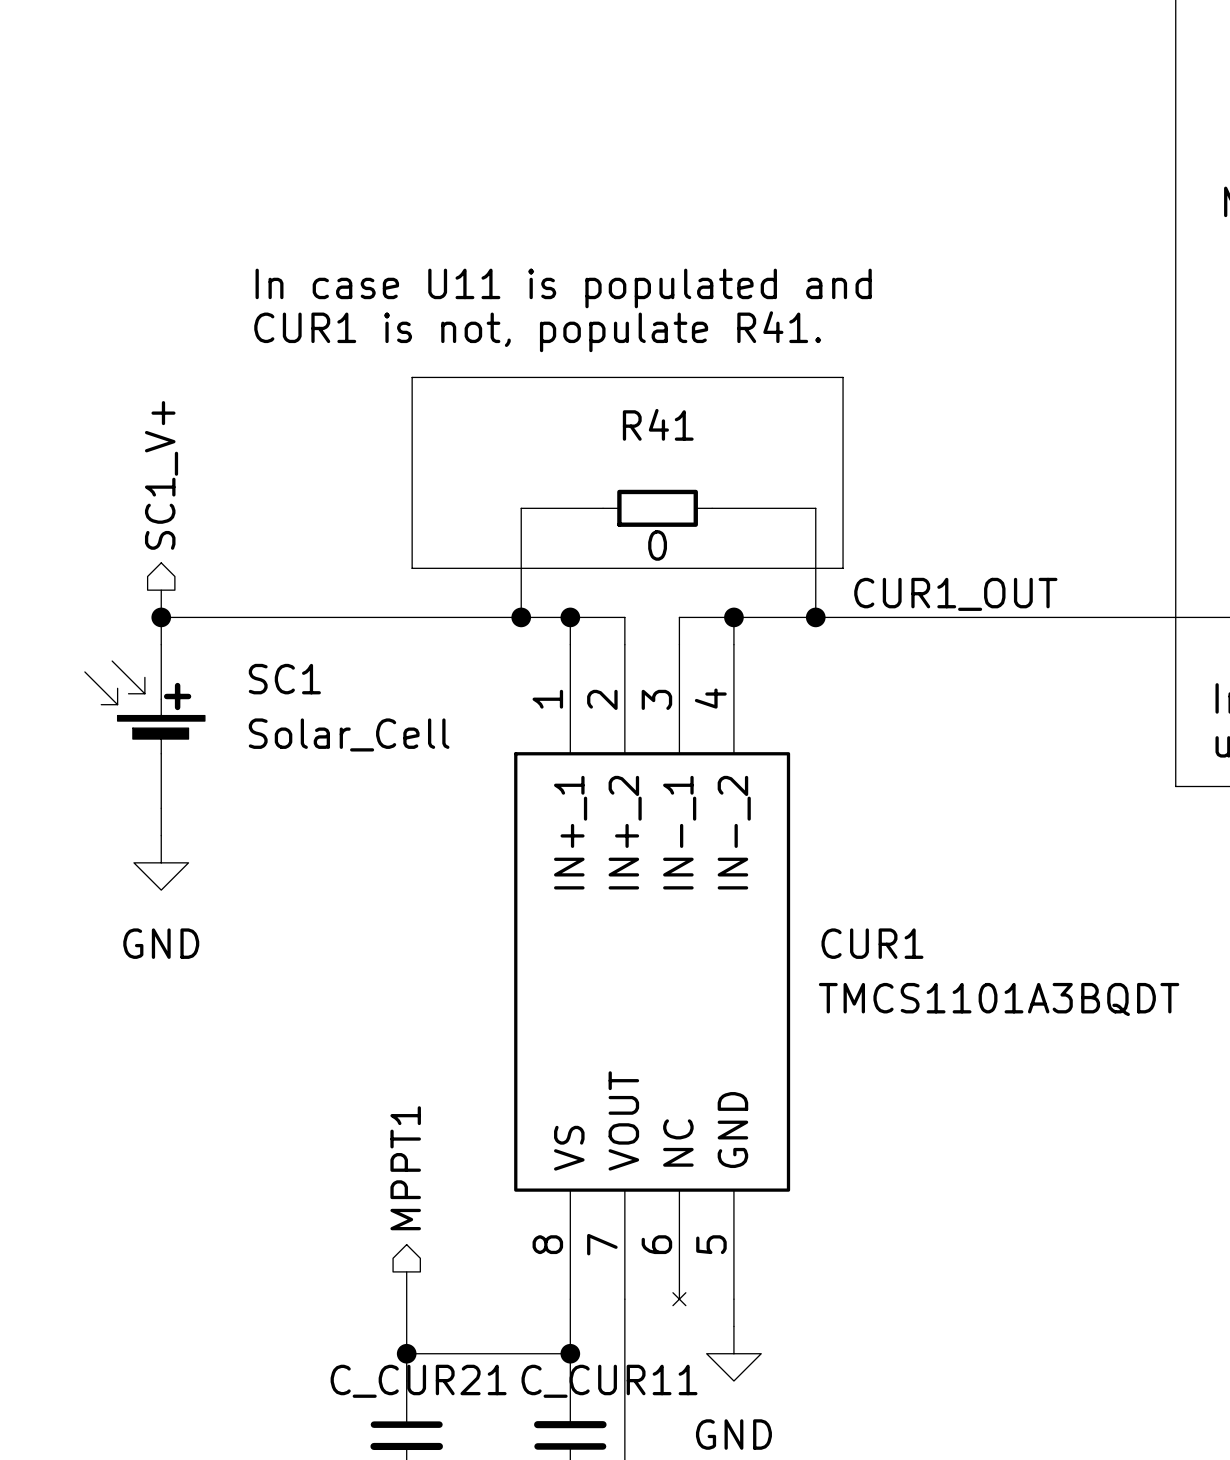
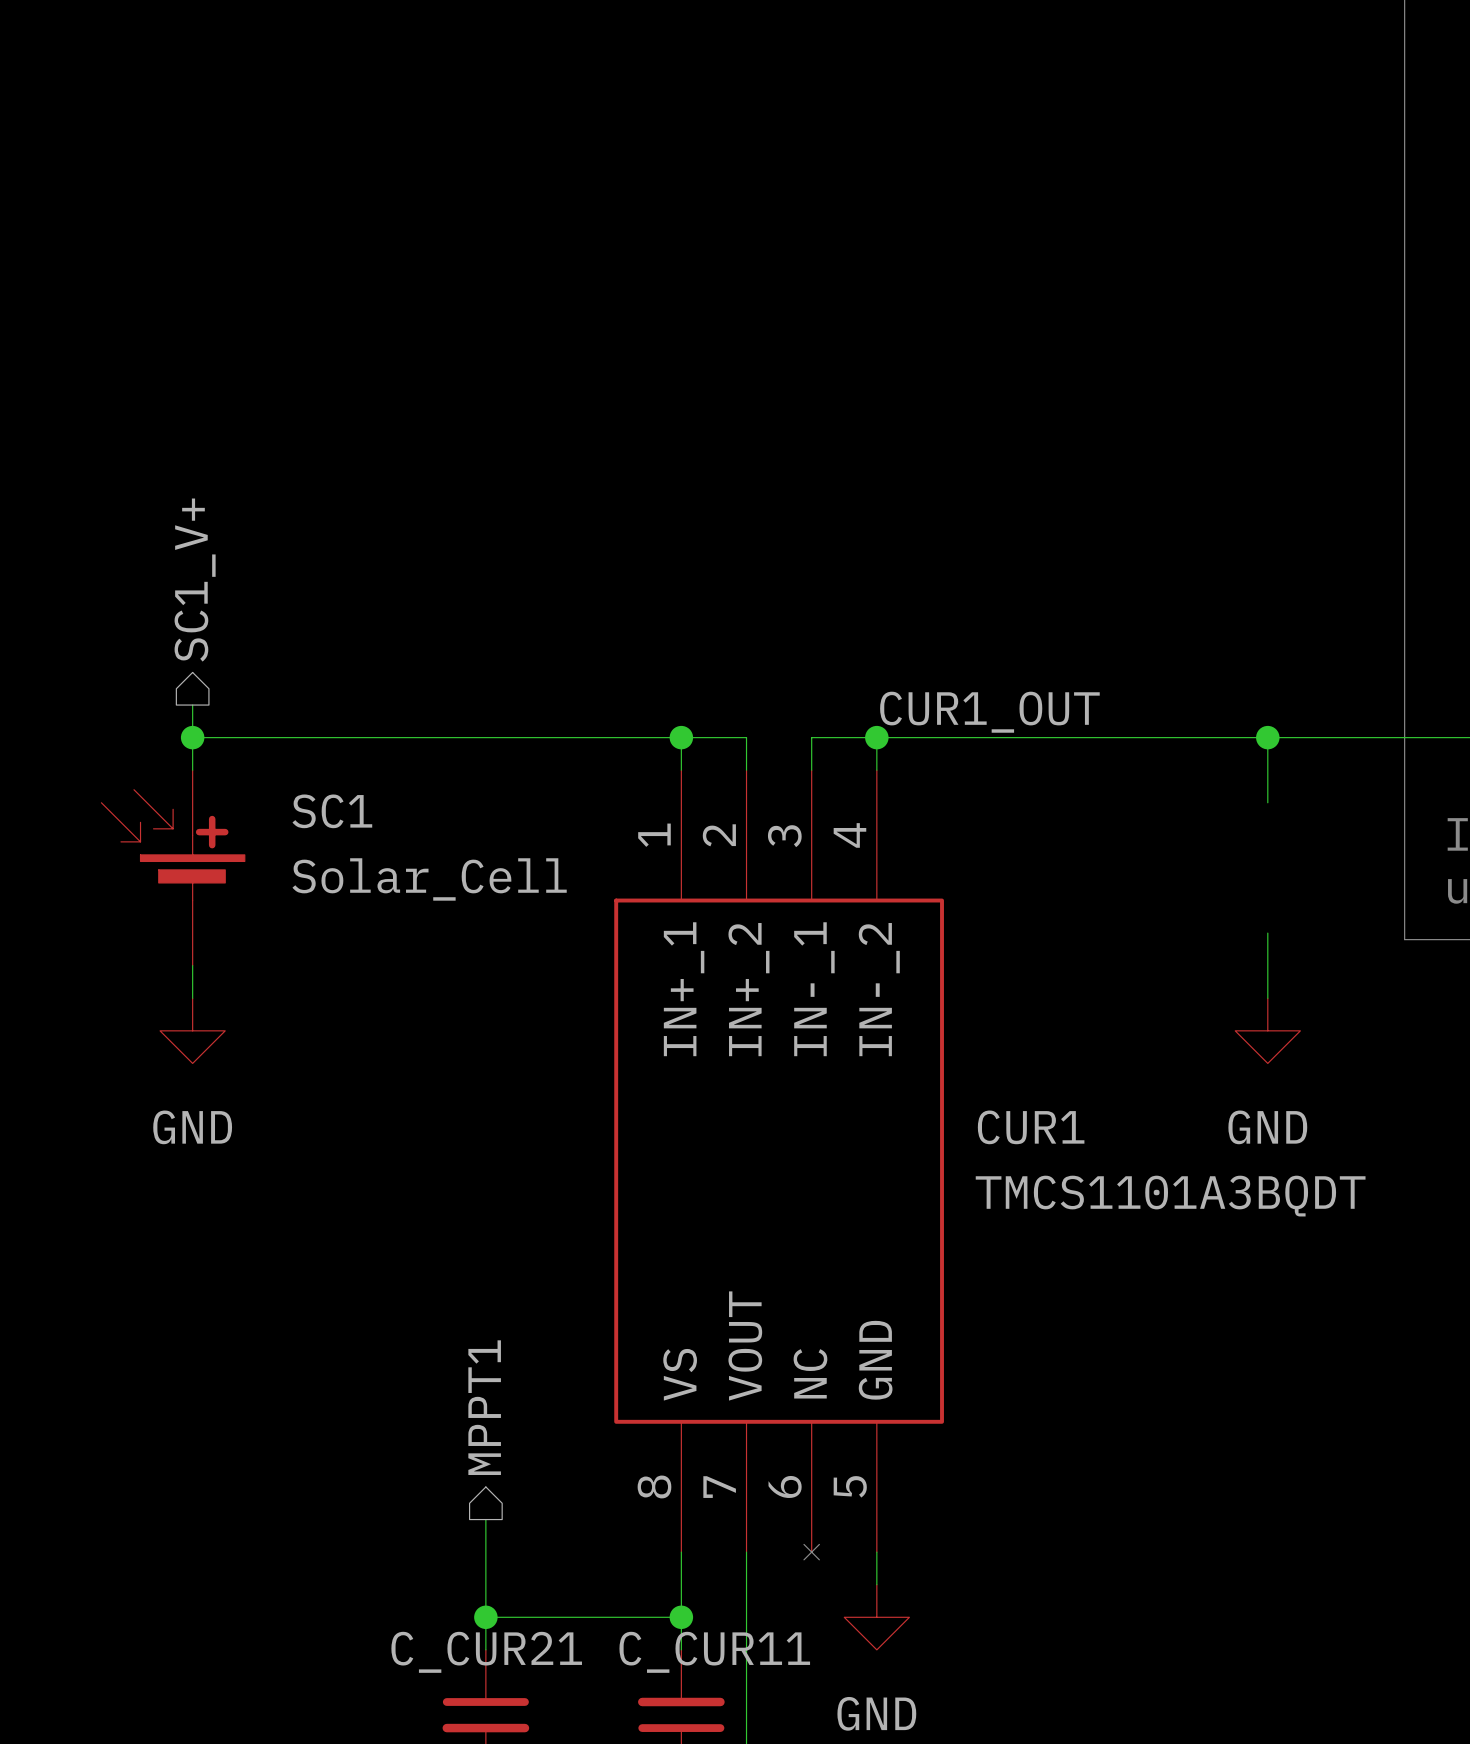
text: In case U11 is populated and (563, 288) -> none
text: CUR1 is not, populate R41. (537, 331) -> none
line: (412, 377) (412, 568) (843, 568) (843, 377) (412, 377) -> none
wire: (603, 508) (521, 508) (521, 617) -> none
R41: 0 (657, 508) -> none
wire: (712, 508) (815, 508) (815, 617) -> none
label position: CUR1_OUT (955, 594) -> CUR1_OUT (989, 712)
junction: (521, 617) -> none
junction: (815, 617) -> none
wire: none -> (1267, 737) (1267, 802)
junction: none -> (1267, 737)
wire: none -> (1267, 933) (1267, 998)
power symbol: none -> GND (1267, 1030)

